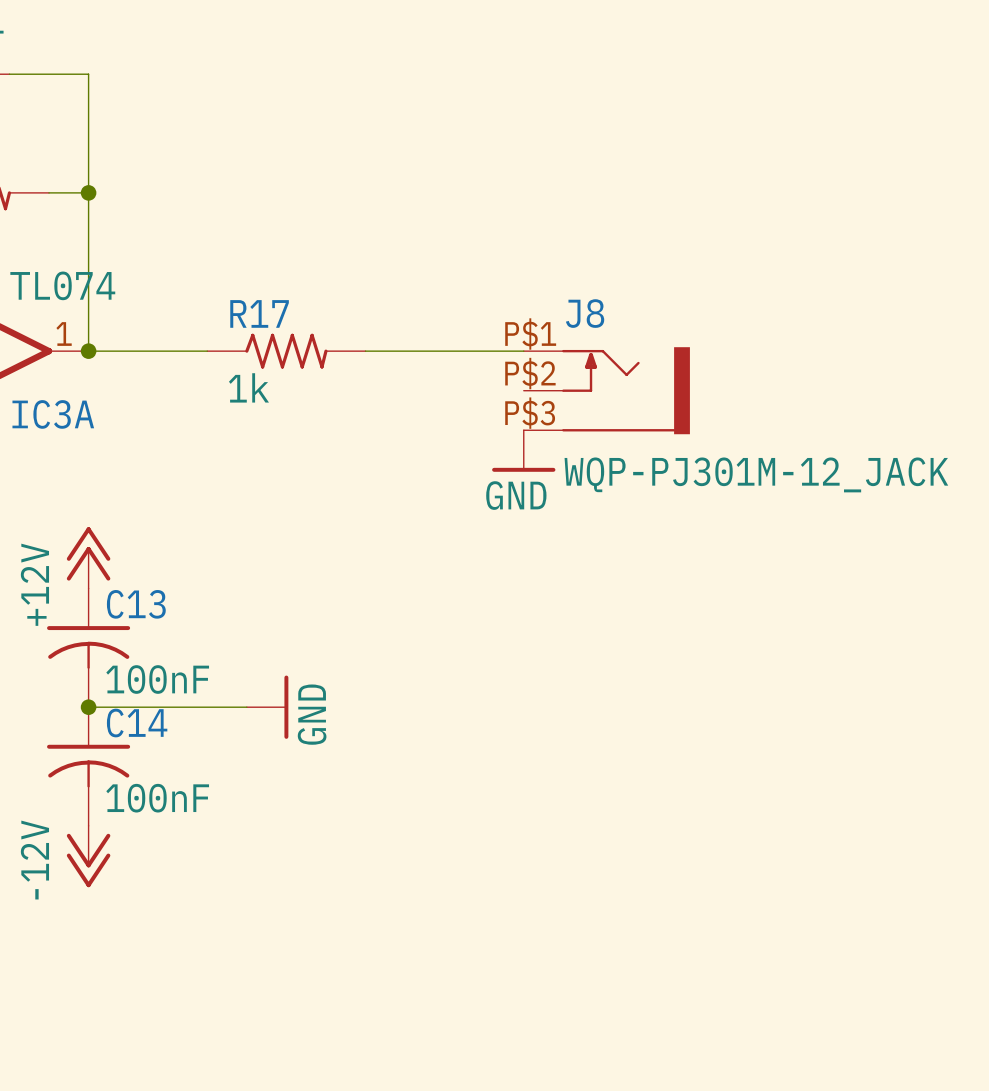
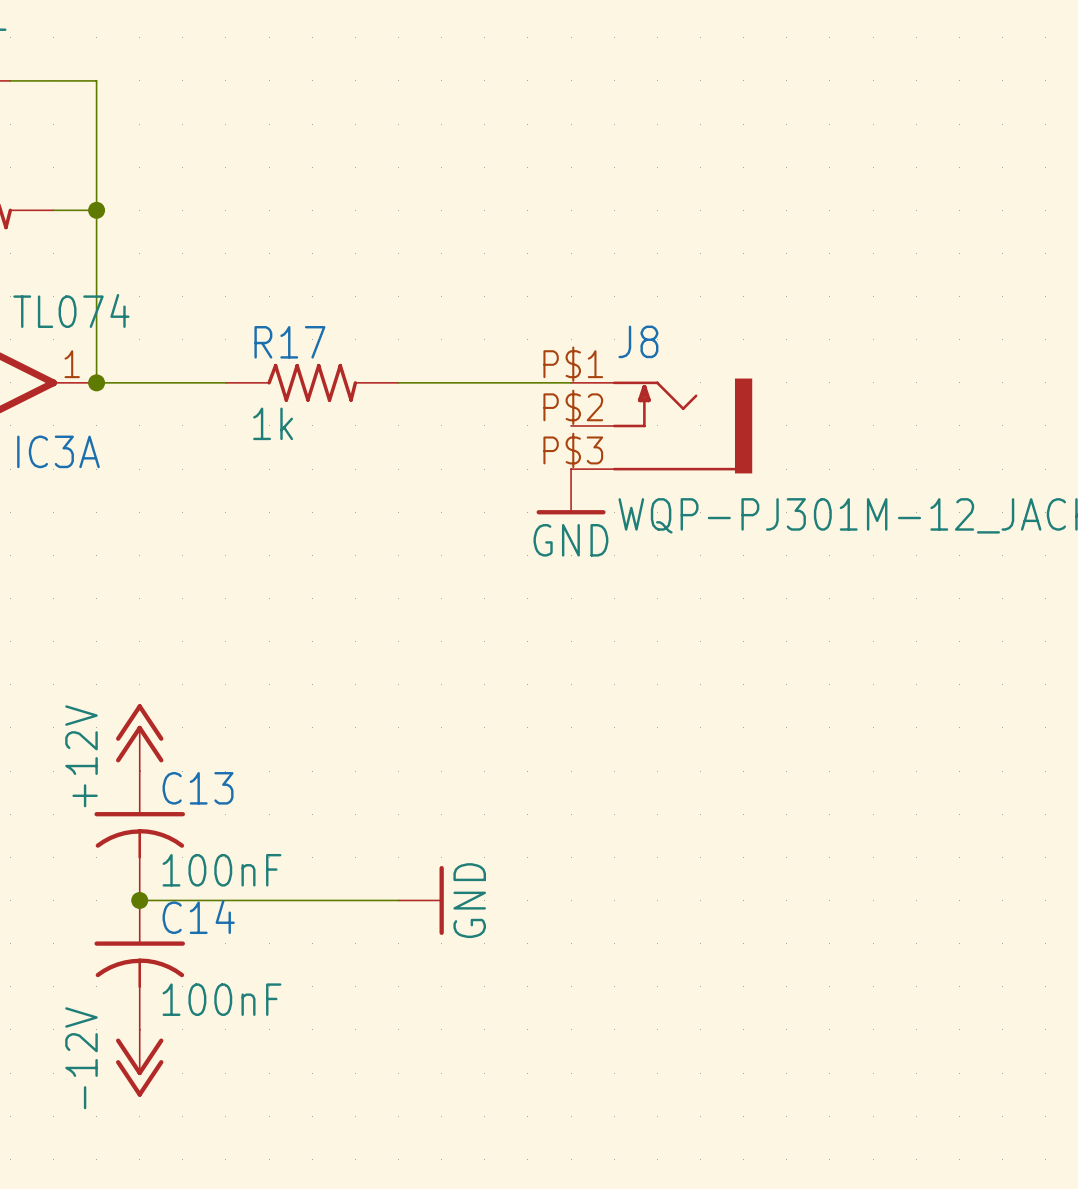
power symbol: +12V (88, 557) -> none
C13 position: (88, 647) -> (139, 835)
power symbol: none -> +12V (139, 737)
wire: (88, 707) (246, 707) -> none
junction: (88, 707) -> none
power symbol position: GND (267, 707) -> GND (421, 900)
C14 position: (88, 766) -> (139, 965)
wire: none -> (139, 900) (398, 900)
junction: none -> (139, 900)
power symbol: -12V (88, 856) -> none
power symbol: none -> -12V (139, 1063)

